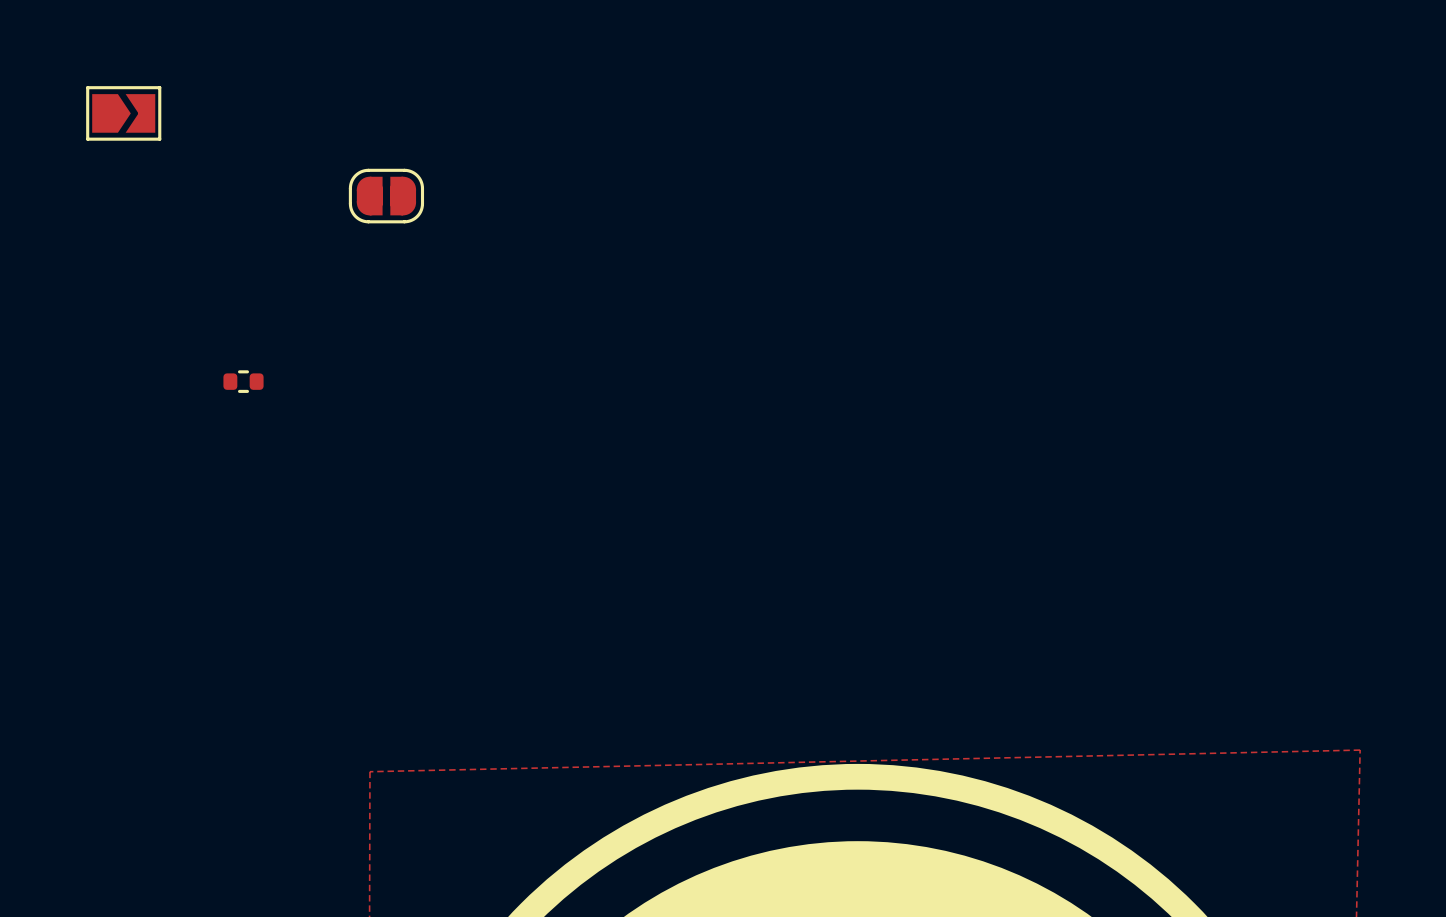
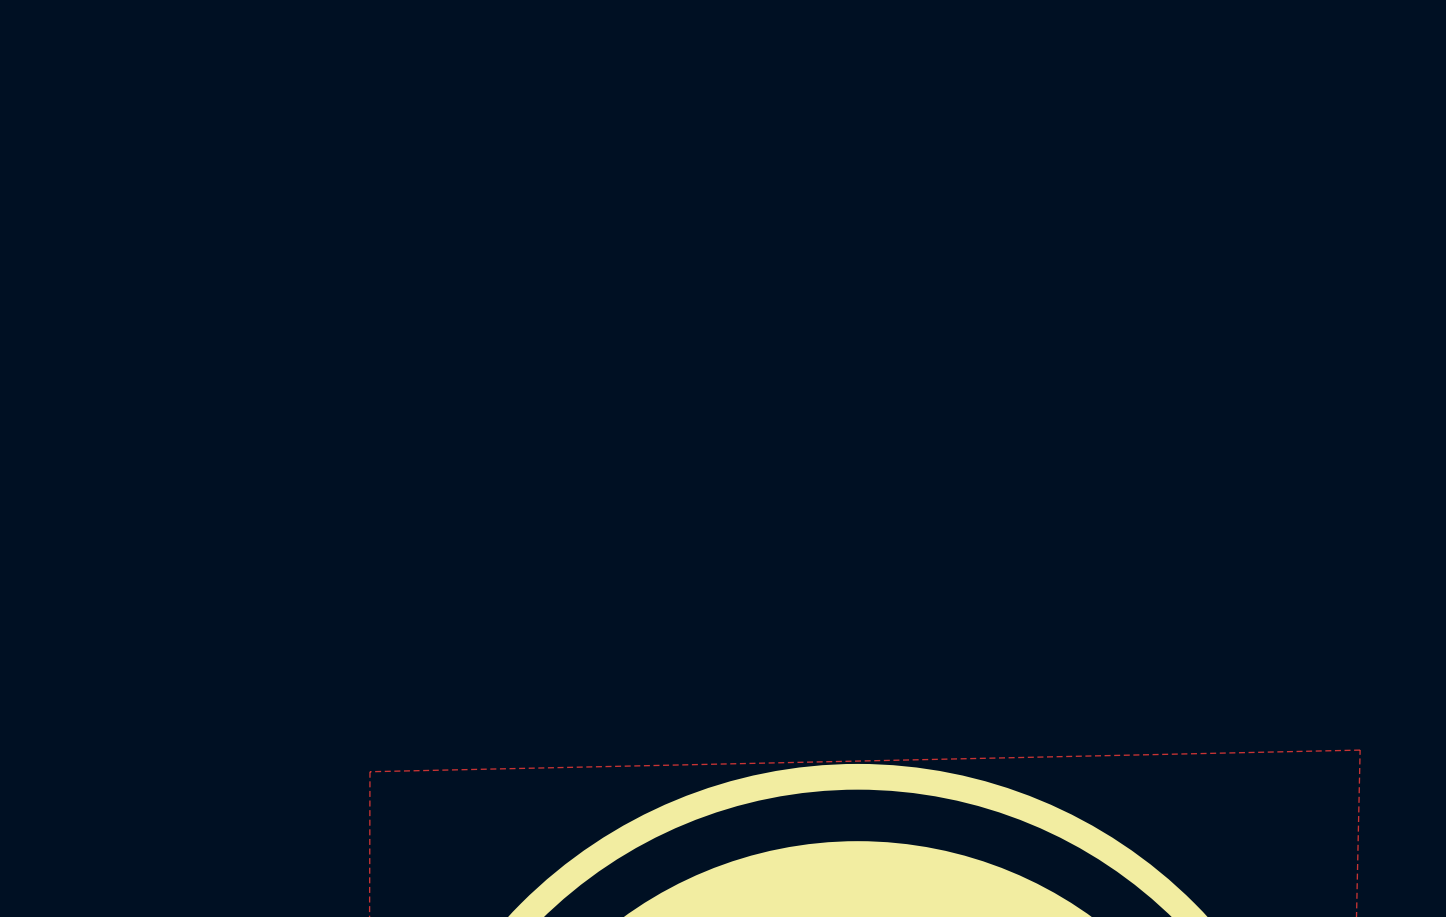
part: (123, 113) -> none
part: (386, 196) -> none
part: (243, 381) -> none

